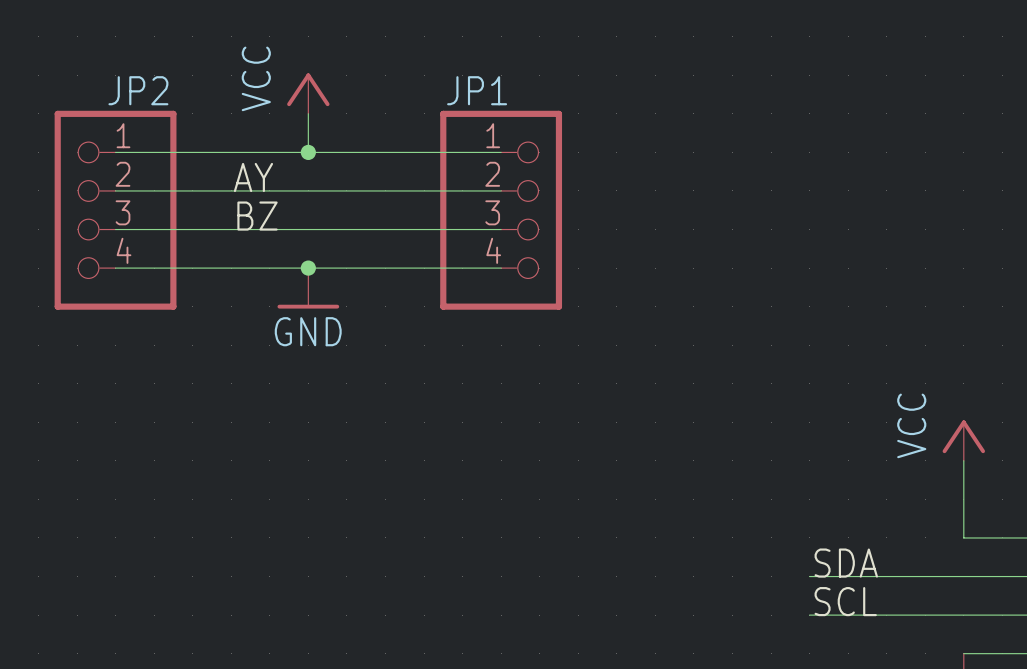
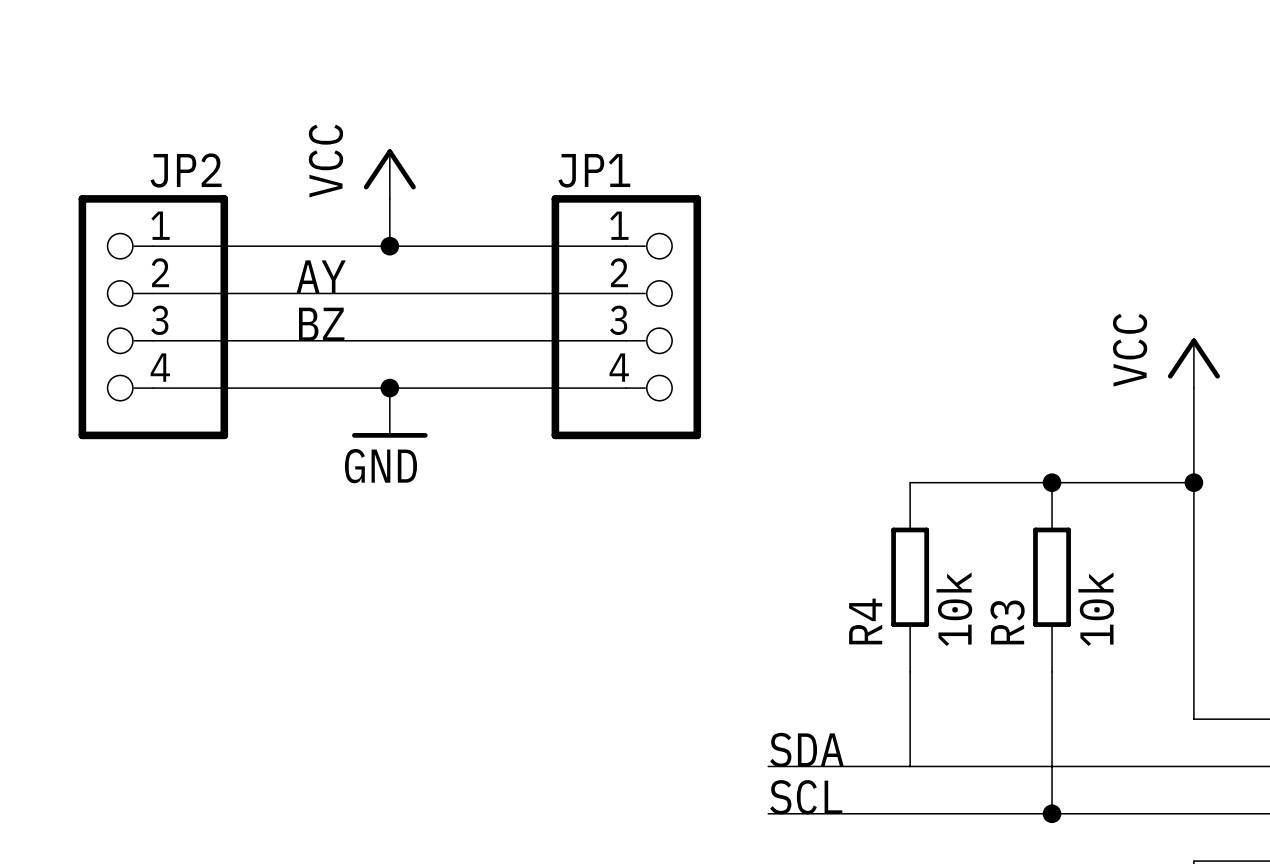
wire: none -> (1193, 388) (1193, 624)
wire: none -> (910, 482) (1193, 482)
junction: none -> (1052, 482)
junction: none -> (1193, 482)
R4: none -> 10k (910, 577)
R3: none -> 10k (1052, 577)
power symbol position: VCC (963, 440) -> VCC (1193, 363)
wire: none -> (910, 671) (910, 766)
wire: none -> (1052, 671) (1052, 813)
label position: SDA (846, 563) -> SDA (806, 749)
wire: none -> (768, 766) (1004, 766)
label position: SCL (845, 601) -> SCL (806, 797)
wire: none -> (768, 813) (1004, 813)
junction: none -> (1052, 813)

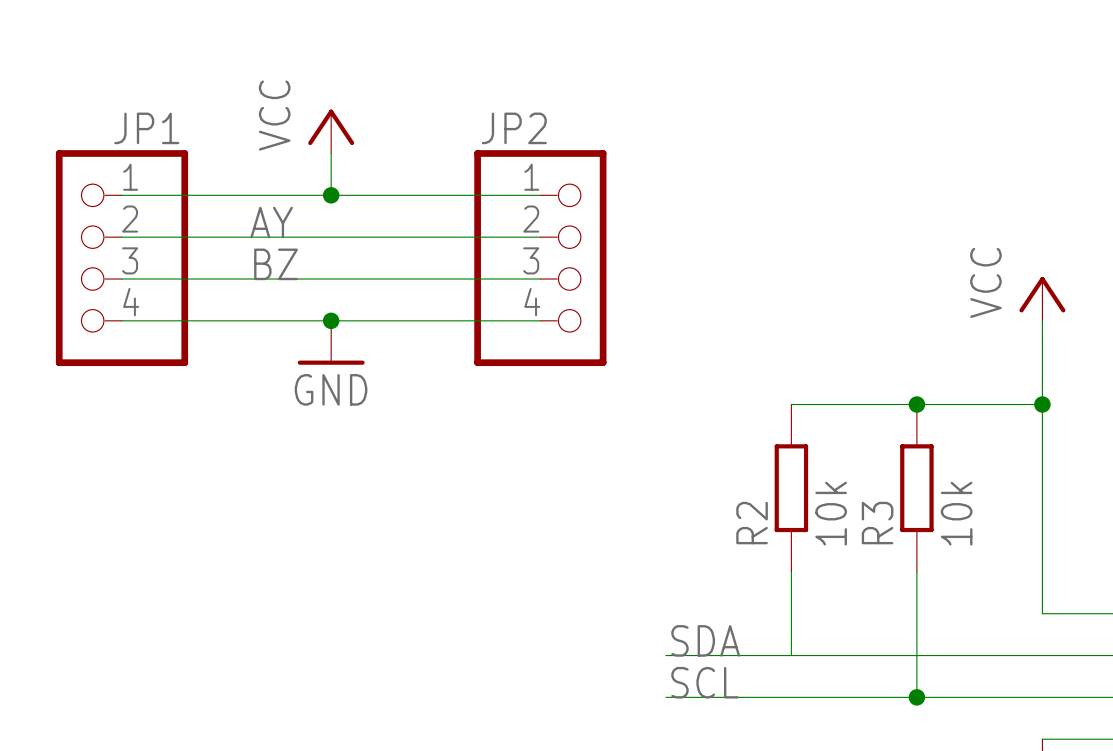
JP2 name: JP2 (186, 170) -> JP1 (146, 128)
JP1 name: JP1 (594, 170) -> JP2 (514, 128)
R4 name: R4 (865, 621) -> R2 (752, 523)

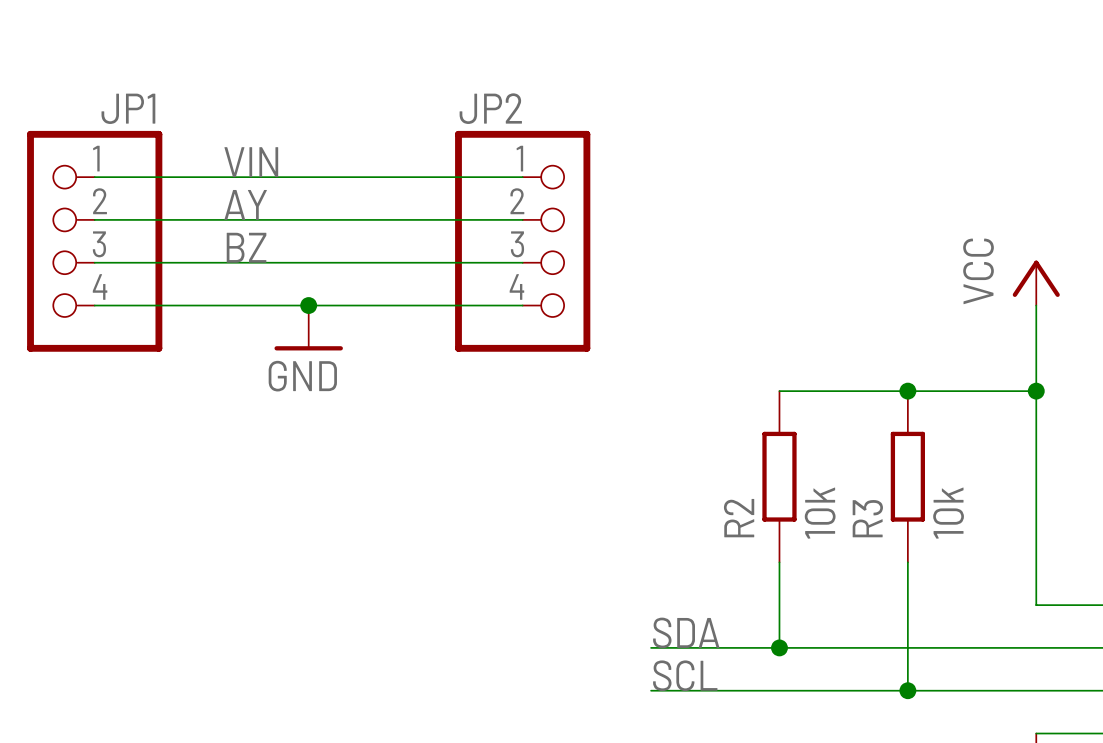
power symbol: VCC (331, 131) -> none
wire: (331, 153) (331, 195) -> none
label: none -> VIN (251, 162)
junction: (331, 195) -> none
junction: none -> (779, 647)

